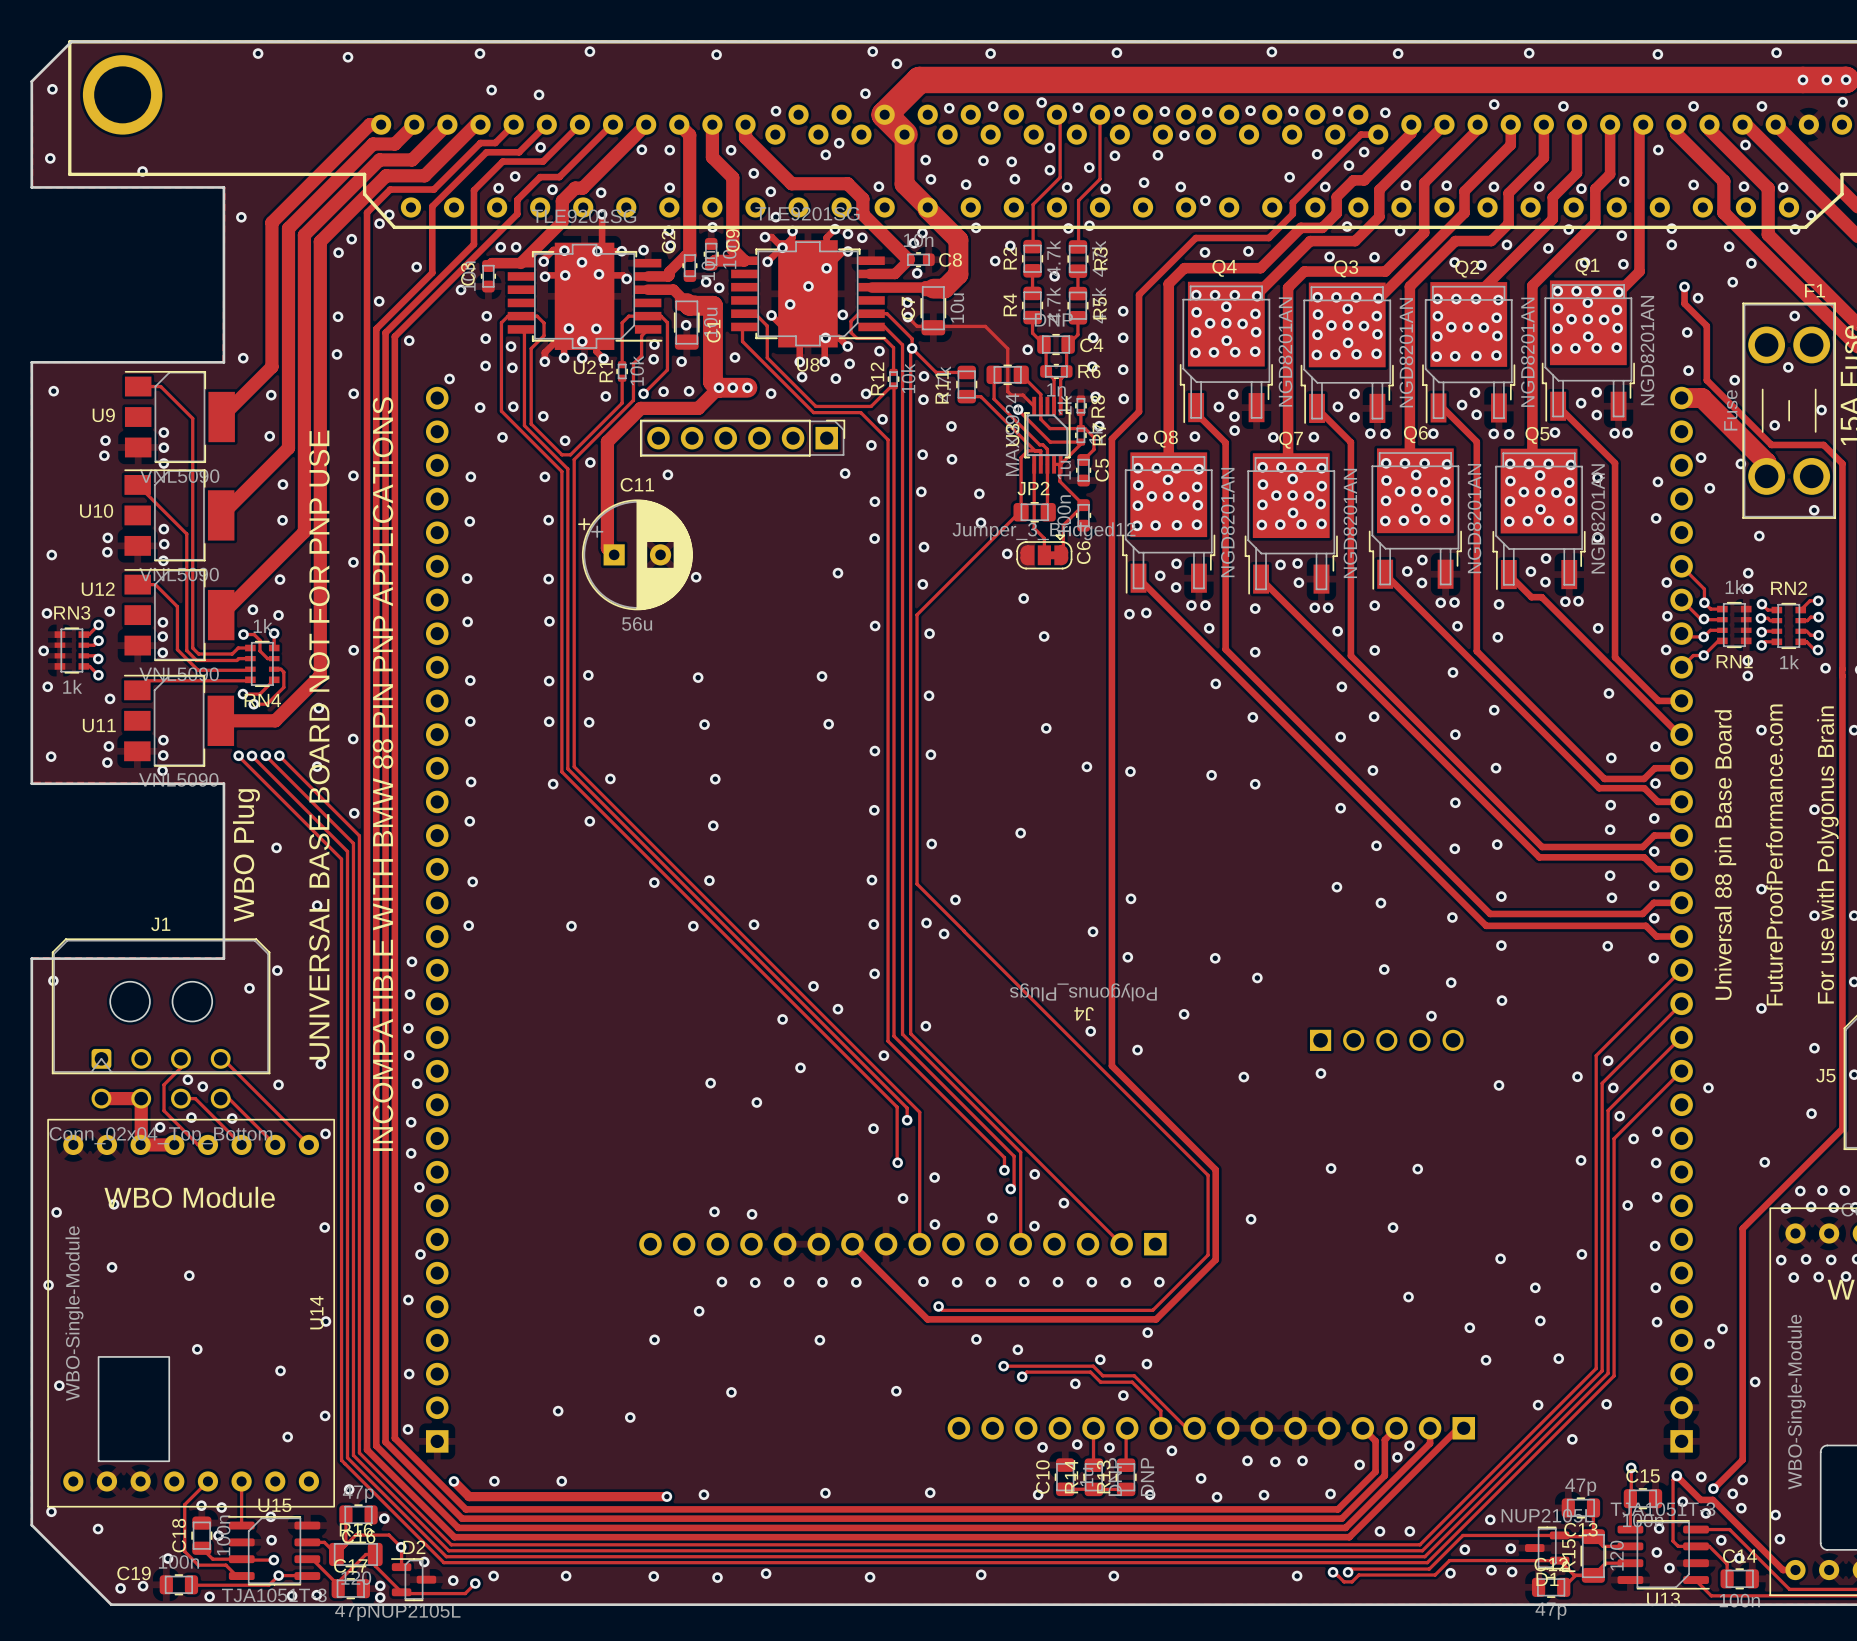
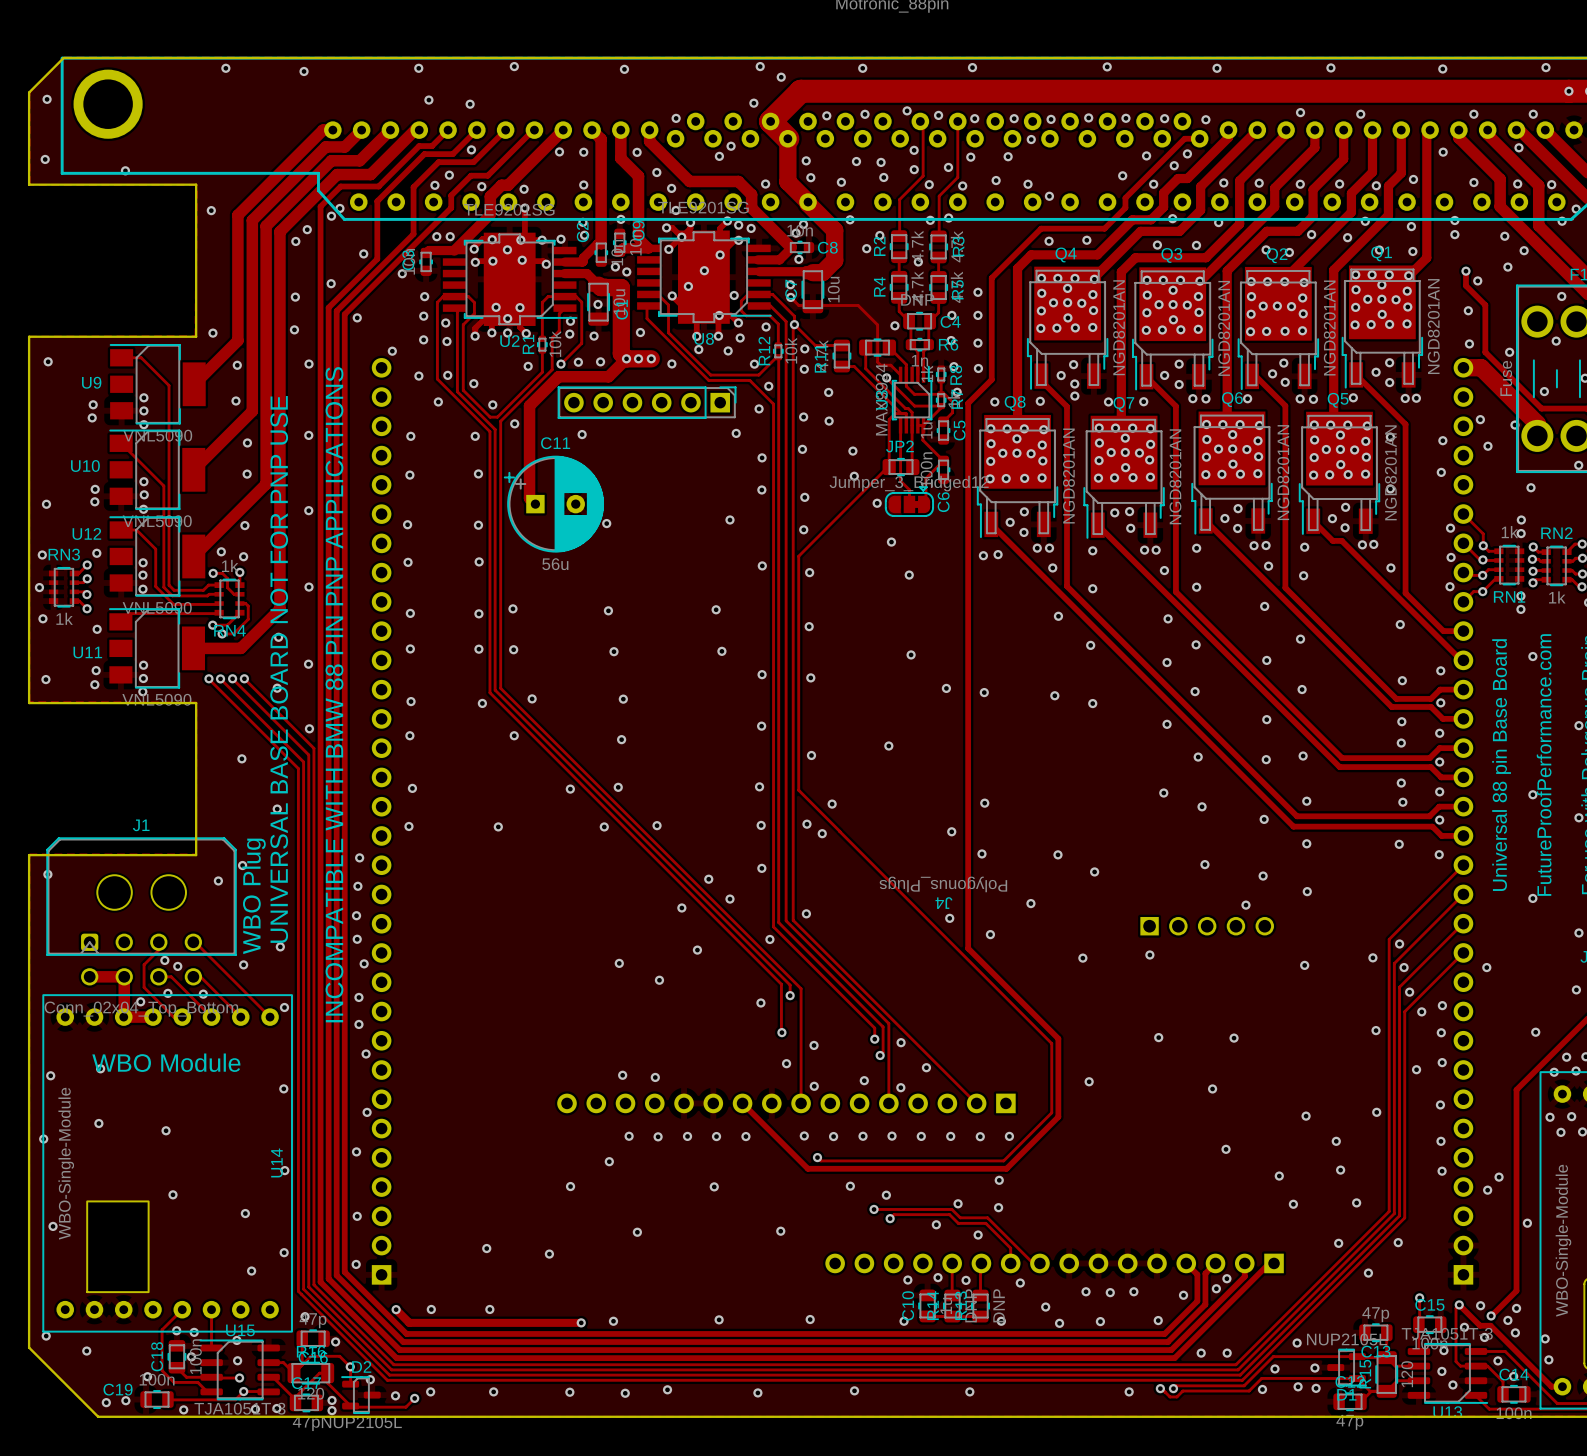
text position: WBO Plug (246, 855) -> WBO Plug (254, 896)

